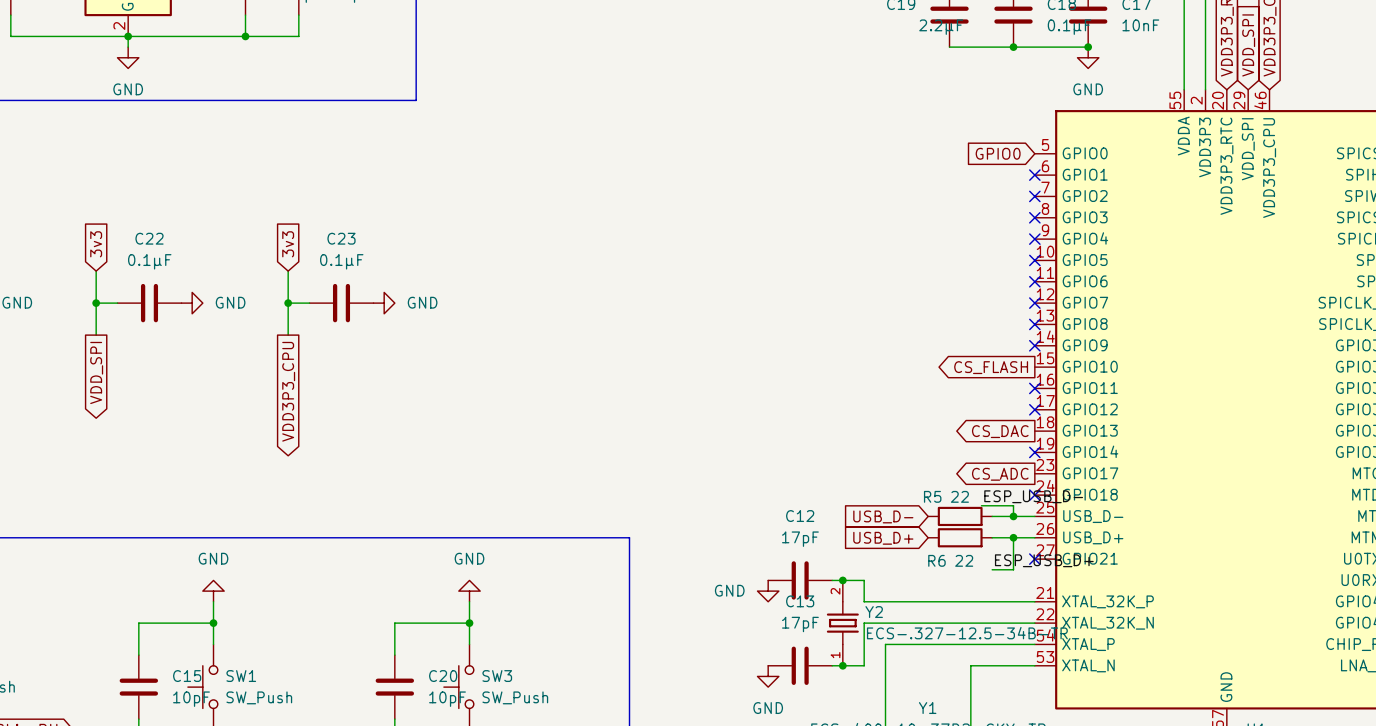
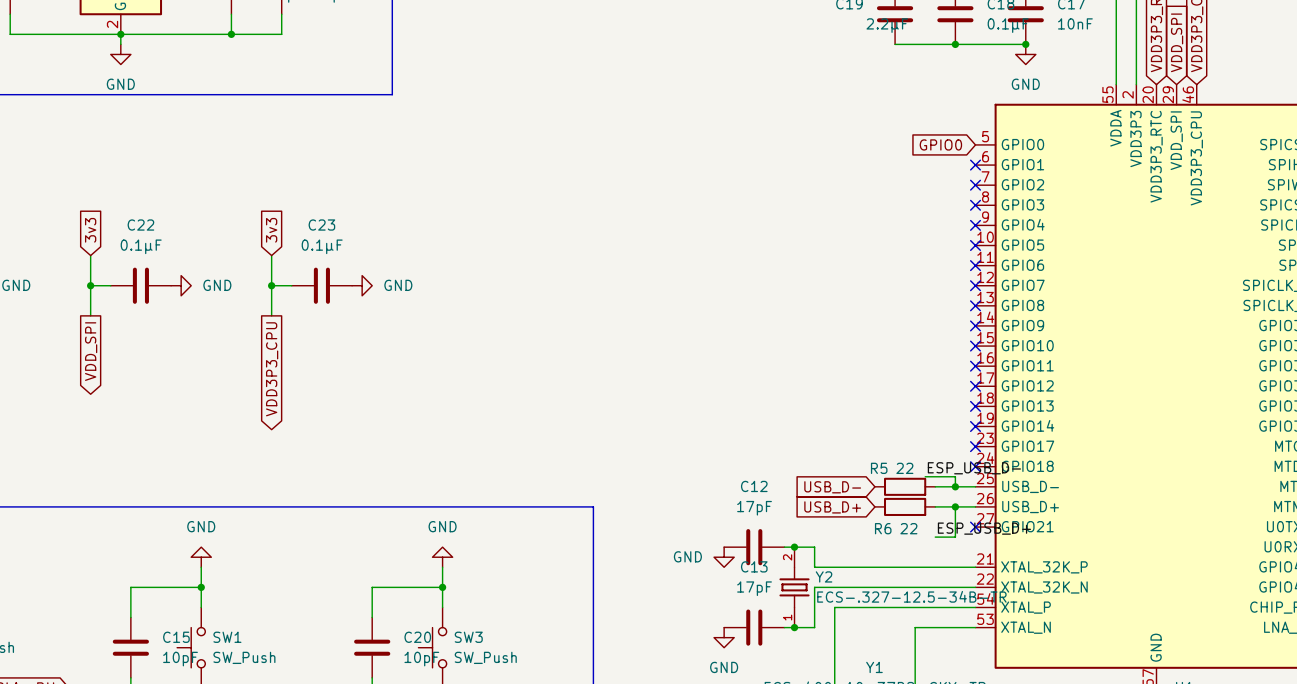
global label: CS_FLASH (991, 367) -> none
no-connect mark: none -> (975, 346)
global label: CS_DAC (1000, 431) -> none
no-connect mark: none -> (975, 406)
no-connect mark: none -> (975, 446)
global label: CS_ADC (1000, 474) -> none

